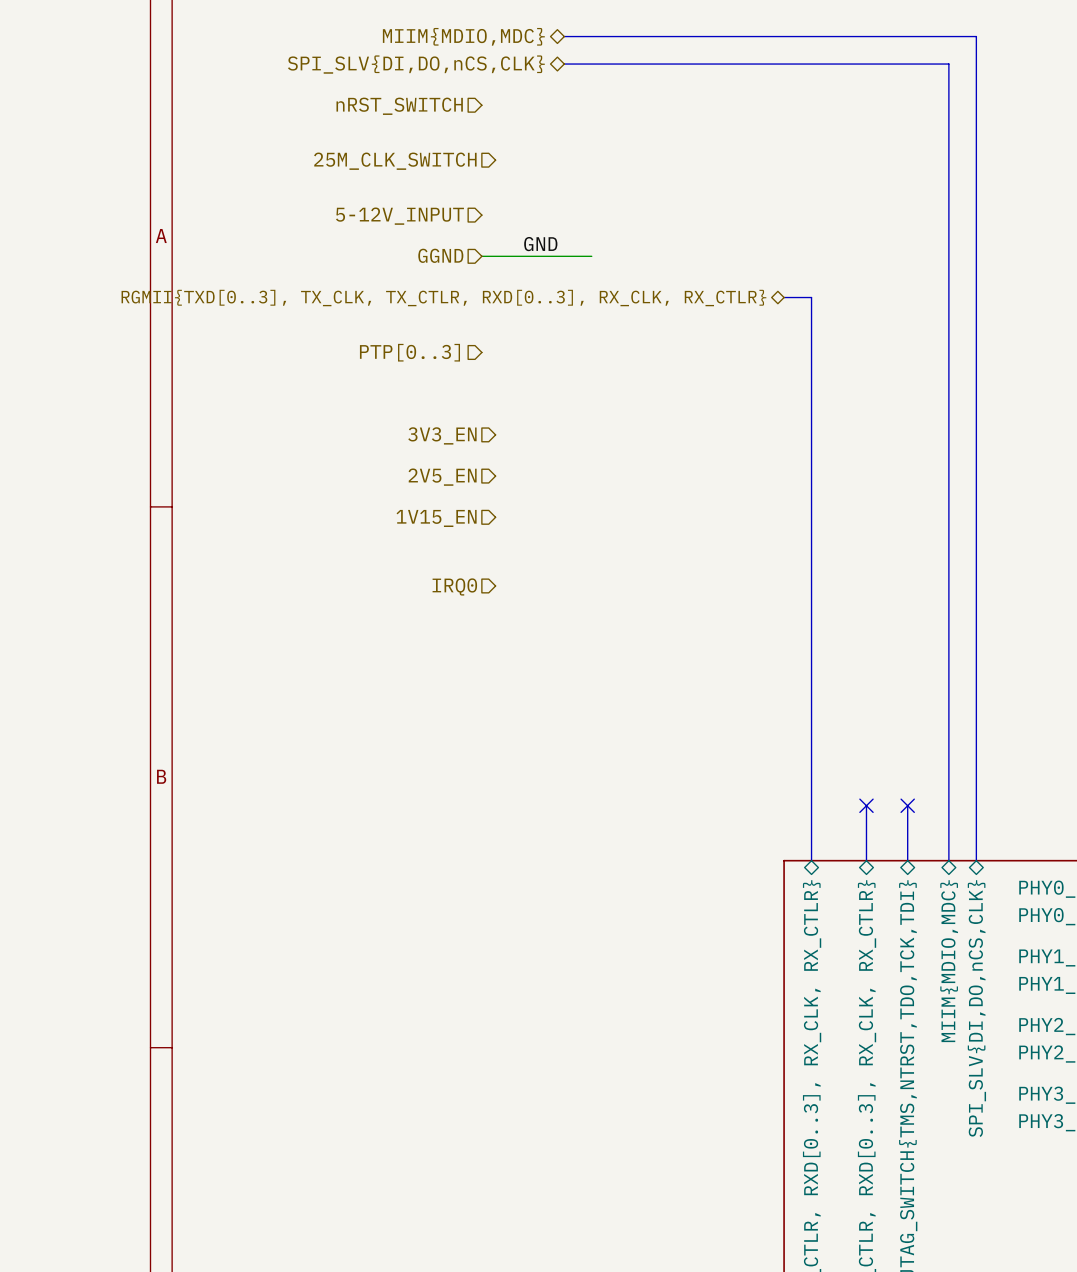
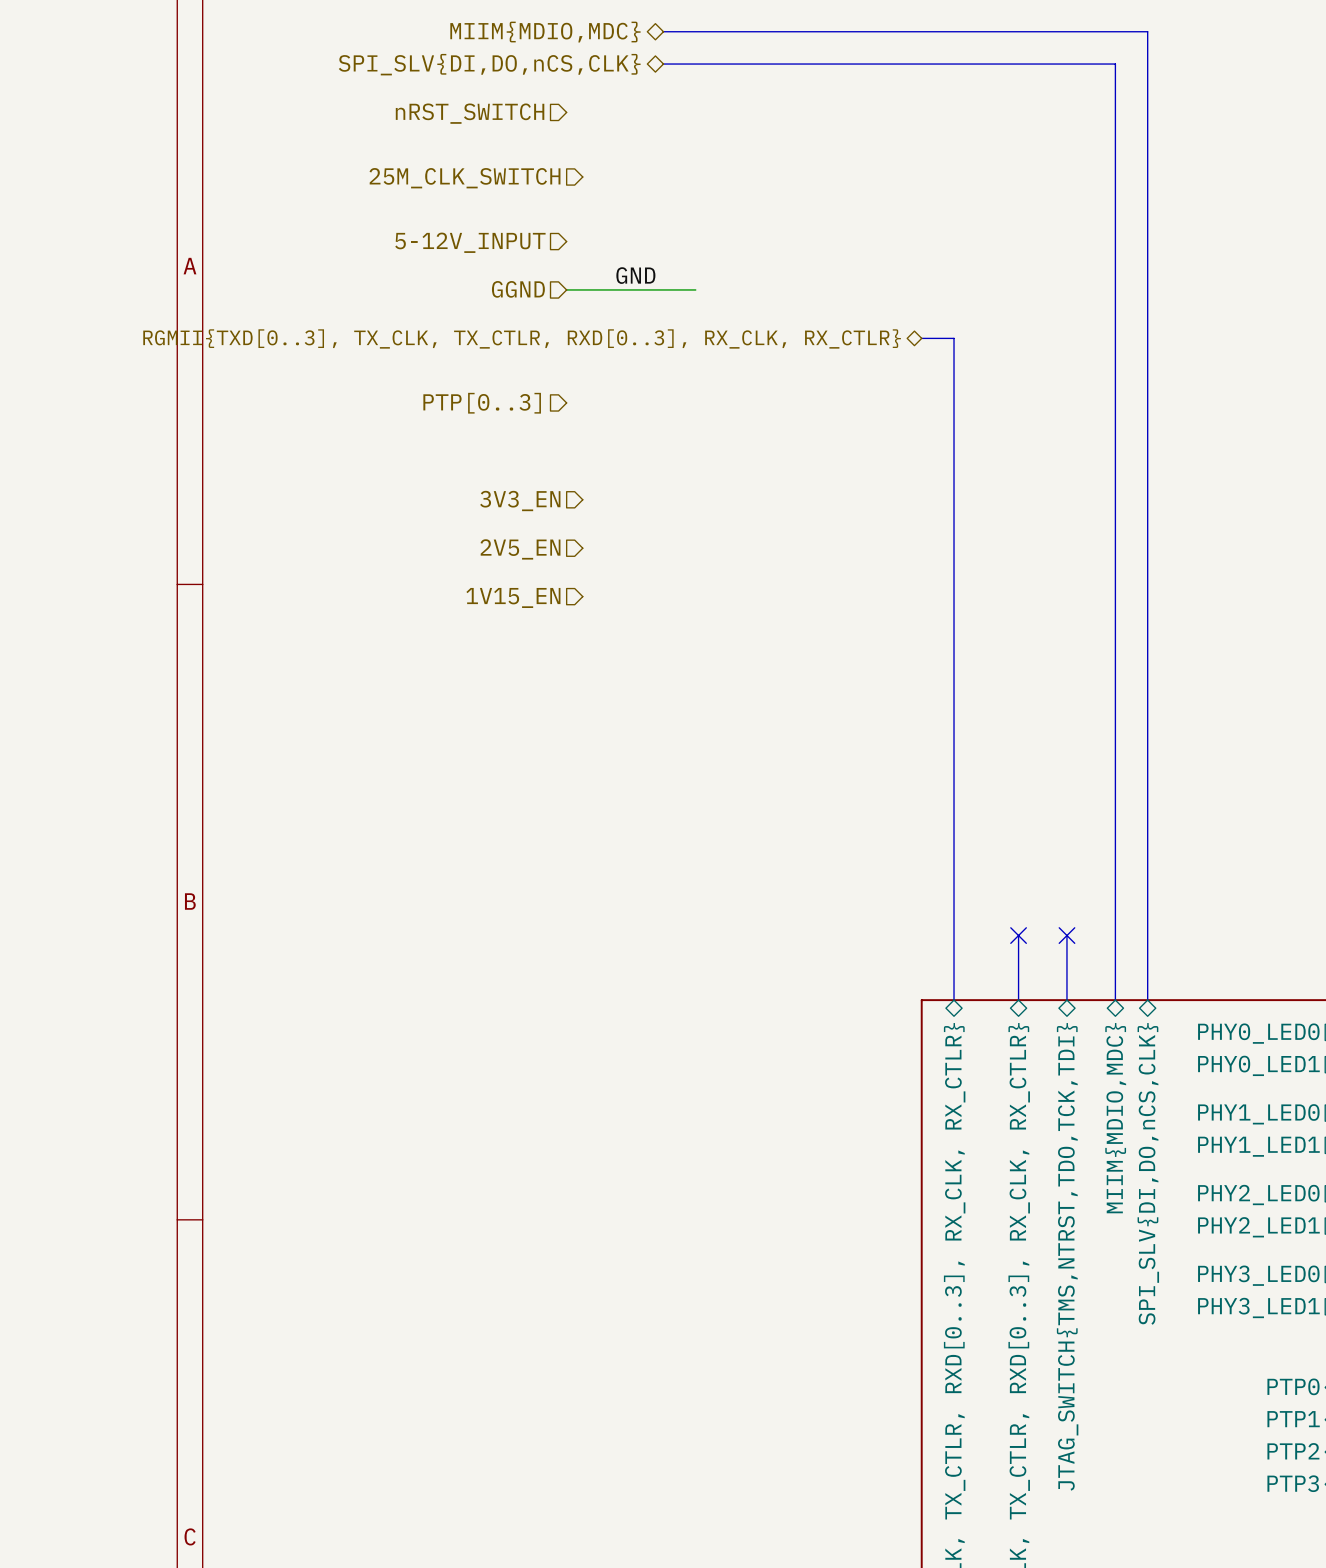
hierarchical label: IRQ0 (454, 586) -> none

